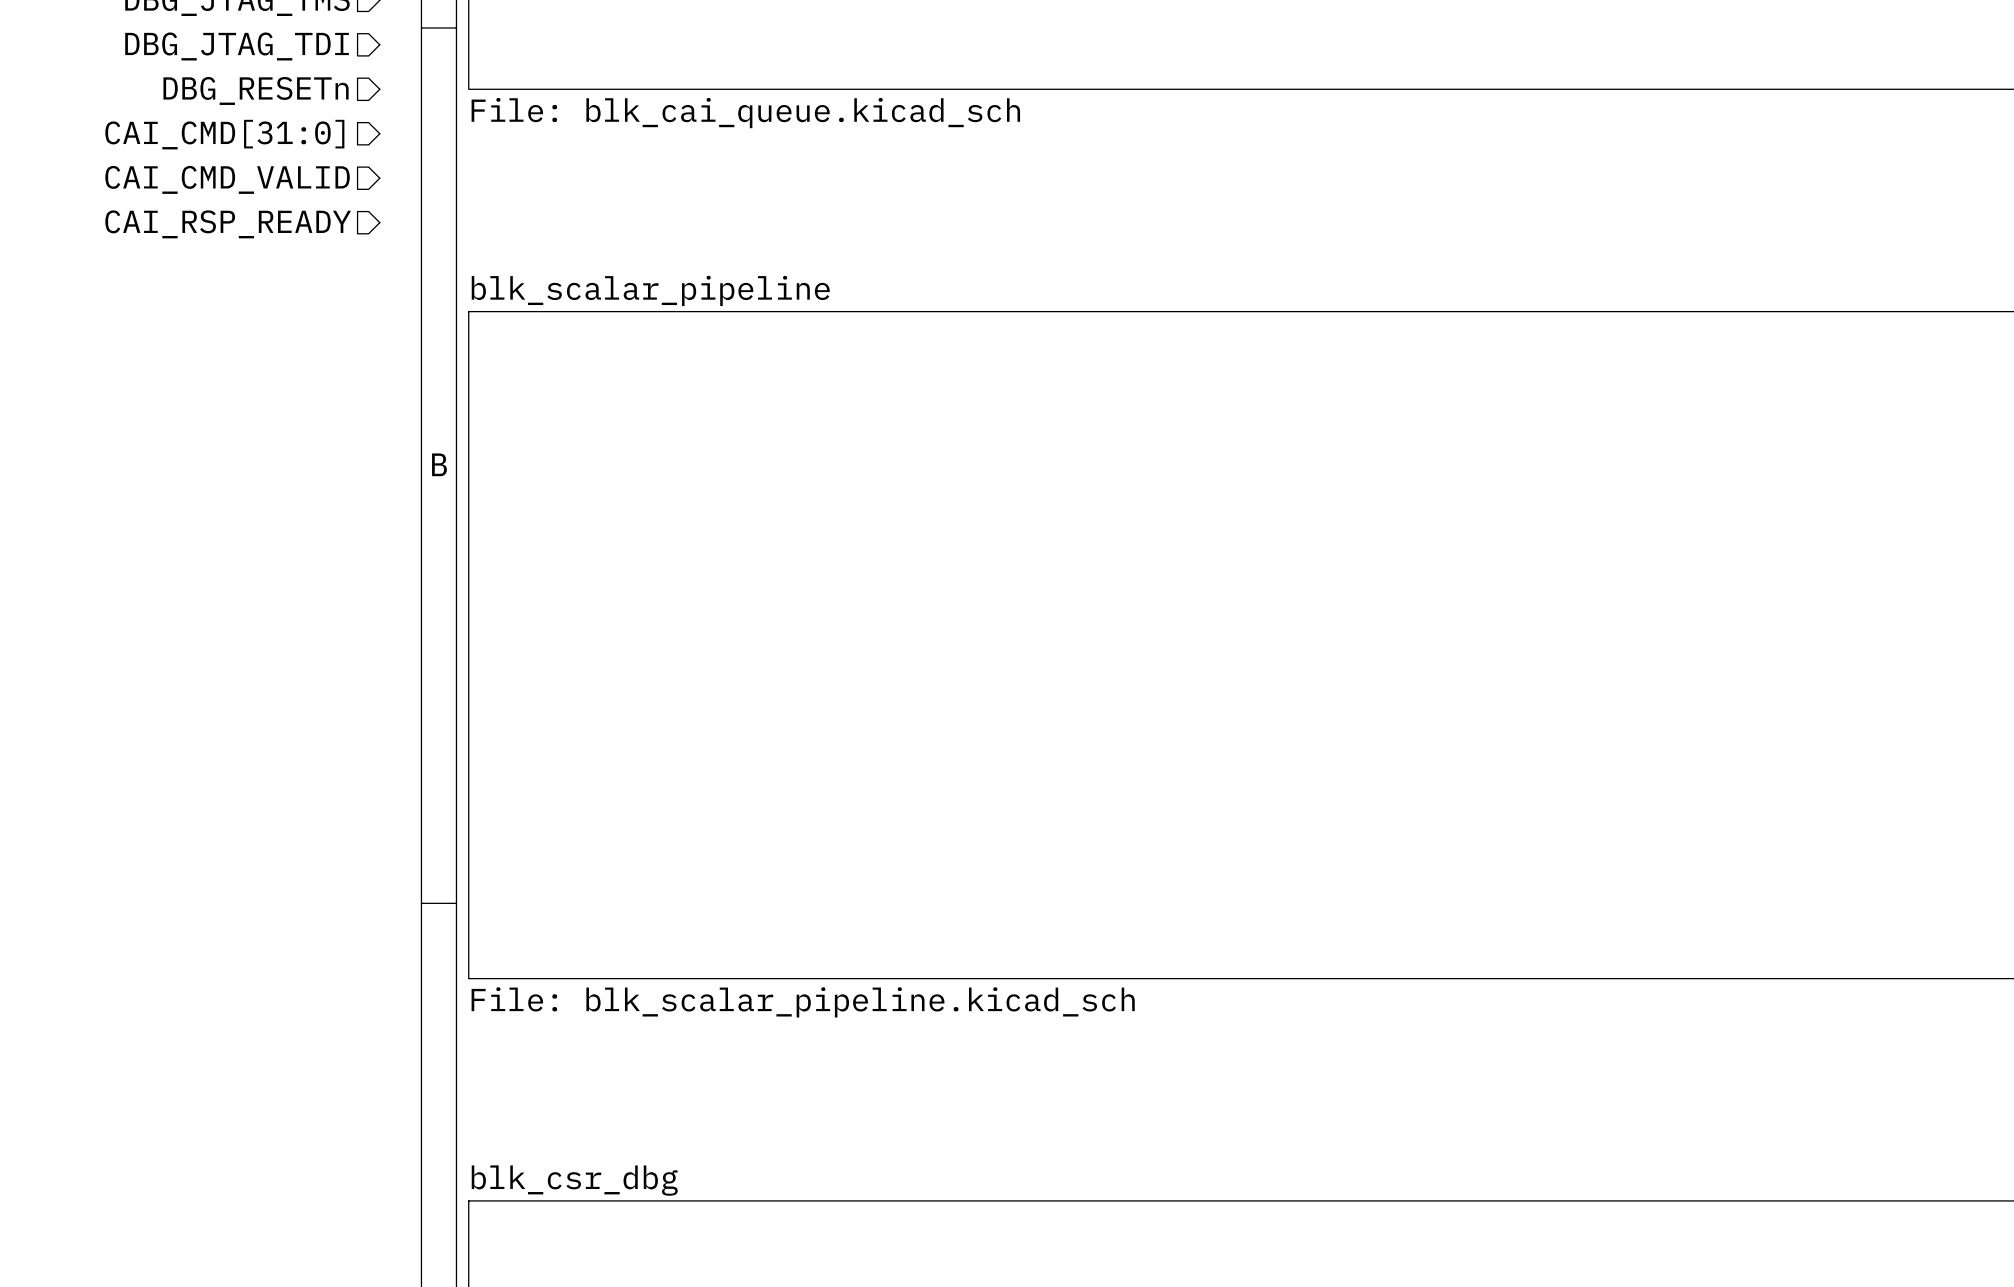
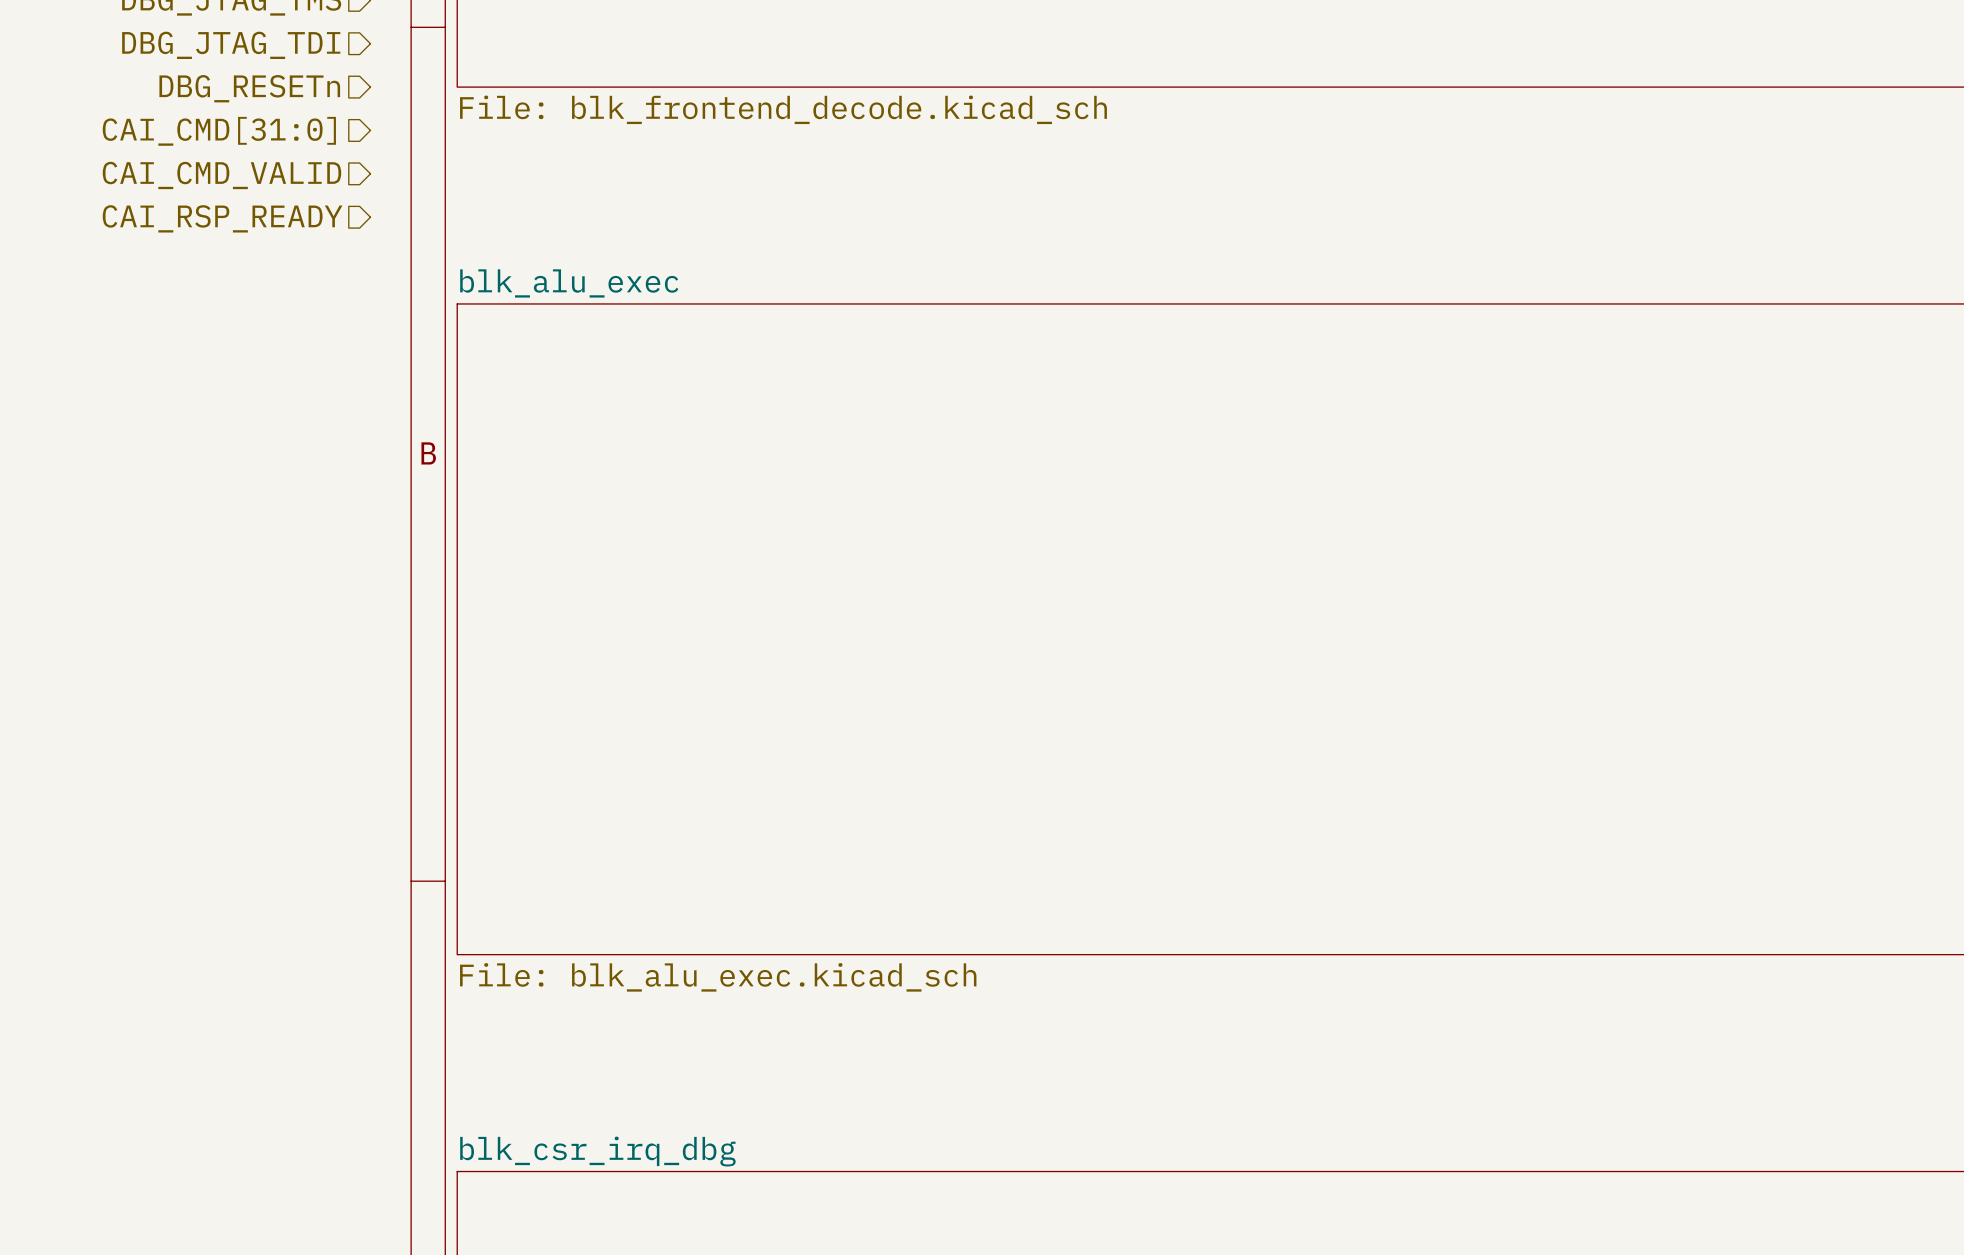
sheet value: File: blk_cai_queue.kicad_sch (745, 113) -> File: blk_frontend_decode.kicad_sch (783, 109)
sheet blk_scalar_pipeline name: blk_scalar_pipeline (650, 290) -> blk_alu_exec (569, 283)
sheet blk_scalar_pipeline value: File: blk_scalar_pipeline.kicad_sch (803, 1002) -> File: blk_alu_exec.kicad_sch (718, 977)
sheet blk_csr_dbg name: blk_csr_dbg (574, 1180) -> blk_csr_irq_dbg (597, 1151)

